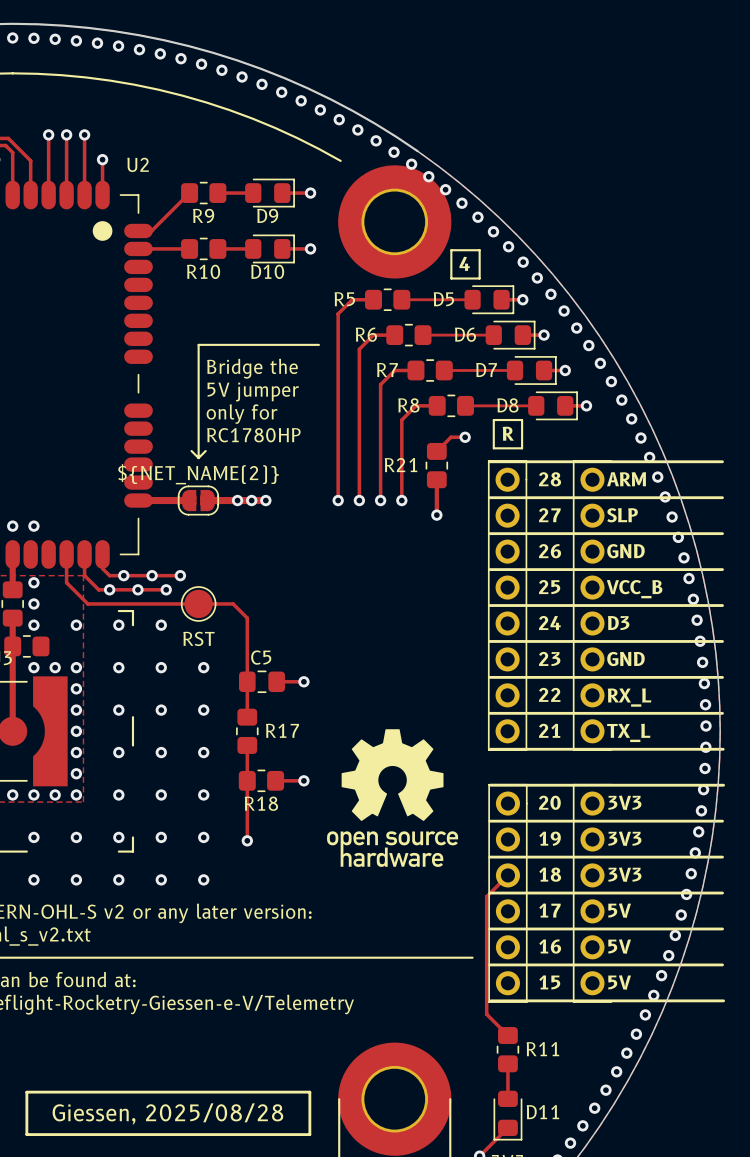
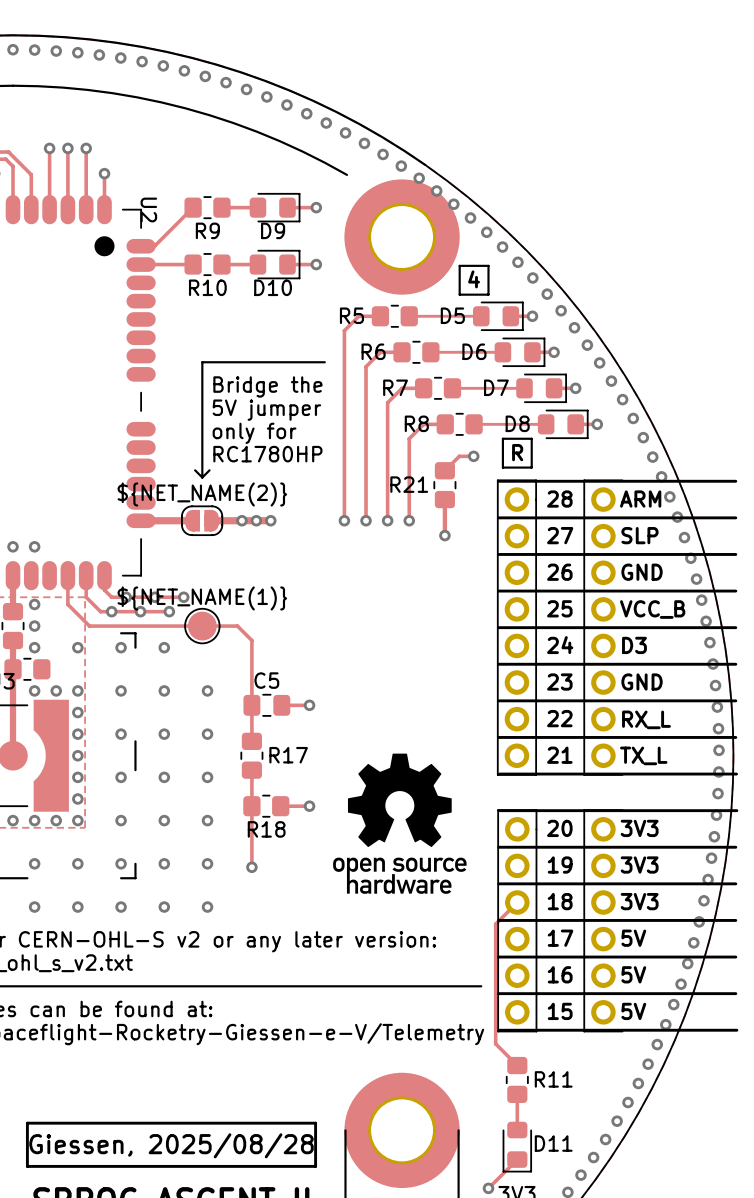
U2 name rotation: 0° (138, 164) -> 90° clockwise (148, 210)
part text: none -> ${NET_NAME(1)} (202, 598)
part text: RST (198, 638) -> none

